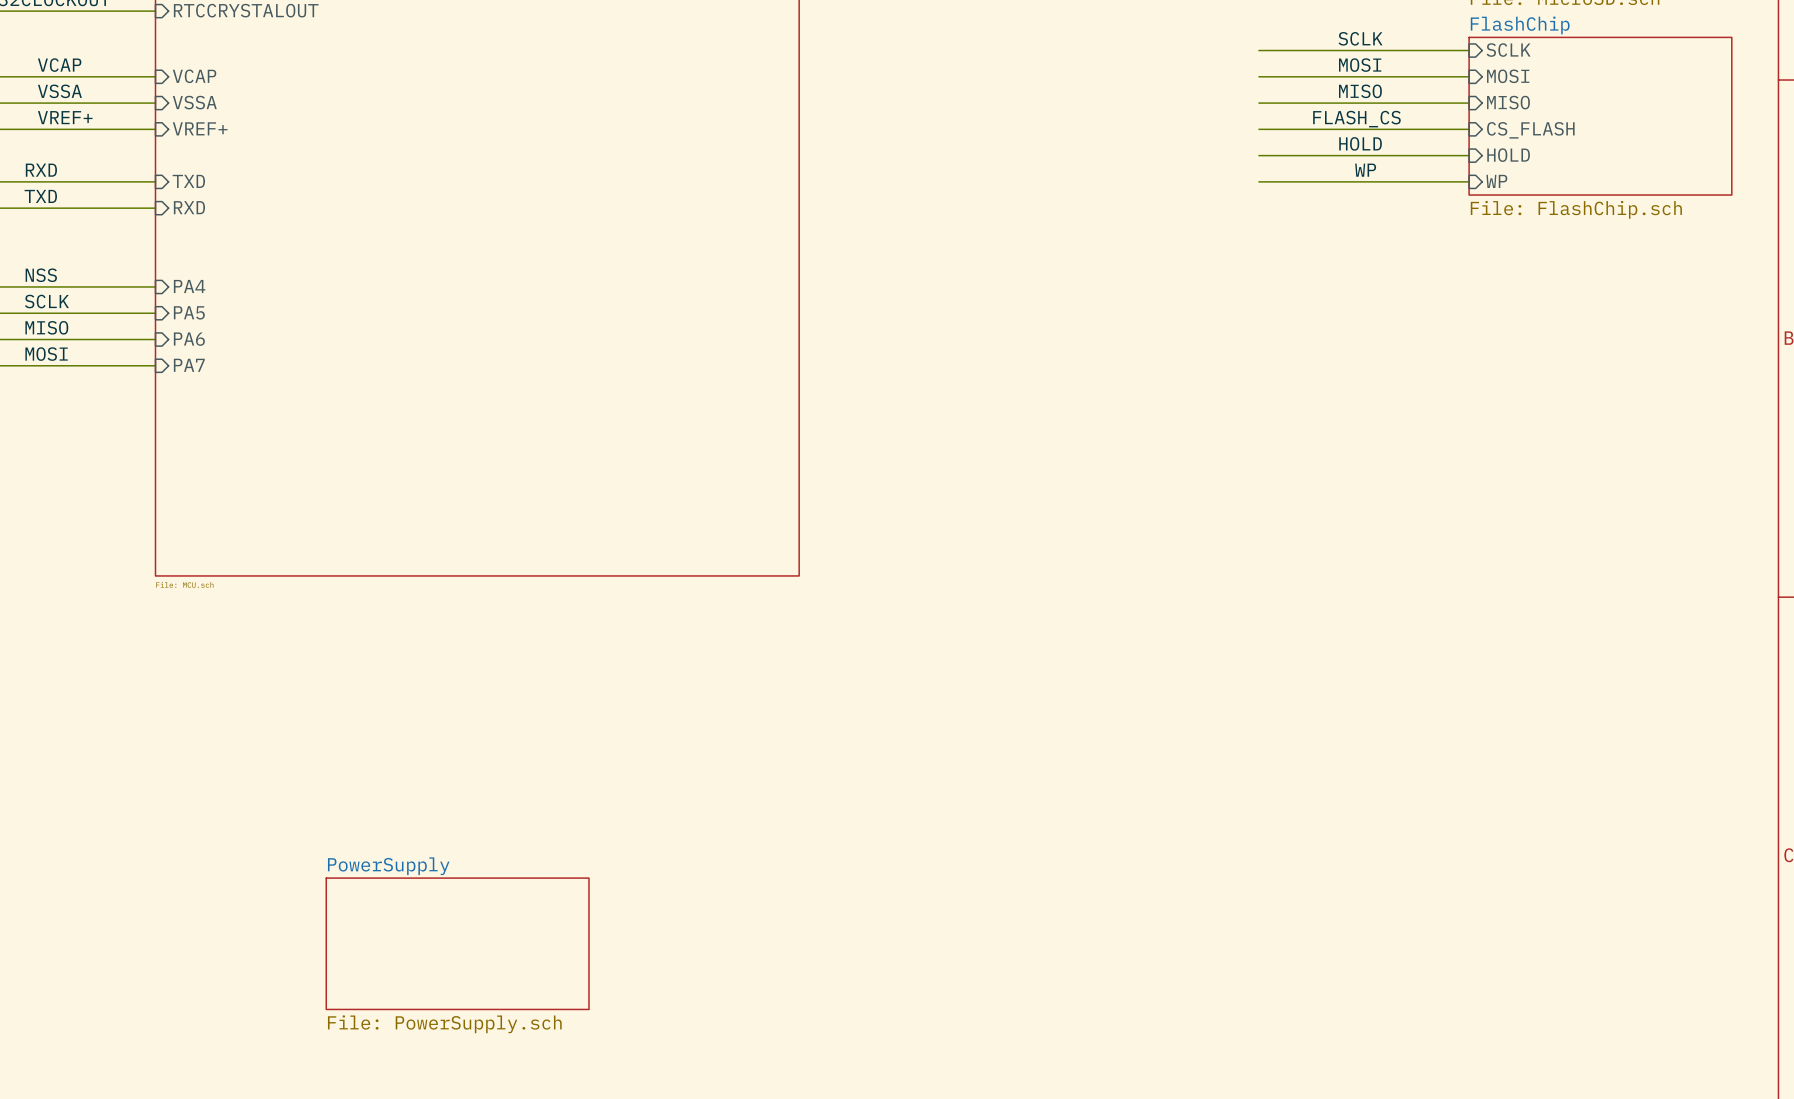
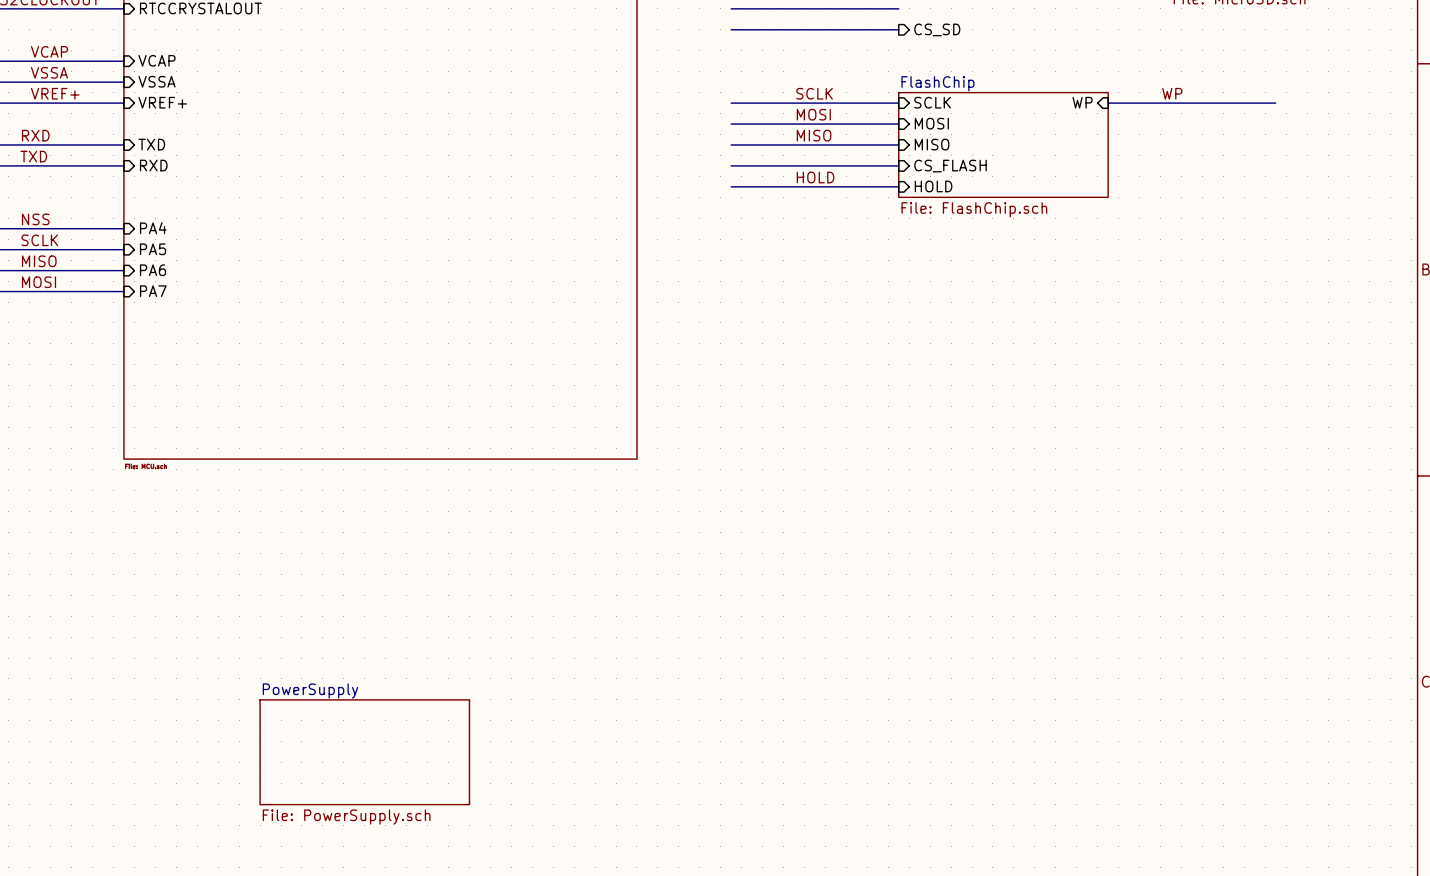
wire: none -> (731, 8) (898, 8)
wire: none -> (731, 29) (898, 29)
sheet pin: none -> CS_SD (937, 29)
label: SCLK (1360, 38) -> none
wire: (1258, 50) (1469, 50) -> none
sheet pin: SCLK (1508, 50) -> none
label: MOSI (1360, 65) -> none
wire: (1258, 76) (1469, 76) -> none
sheet pin: MOSI (1508, 76) -> none
label: MISO (1360, 91) -> none
sheet pin: MISO (1508, 102) -> none
wire: (1258, 103) (1469, 103) -> none
sheet FlashChip: File: FlashChip.sch (1600, 116) -> none
label: none -> SCLK (814, 93)
label: FLASH_CS (1356, 119) -> none
sheet pin: none -> SCLK (932, 102)
wire: none -> (731, 103) (898, 103)
wire: (1258, 129) (1390, 129) -> (1170, 103) (1275, 103)
sheet pin: CS_FLASH (1530, 130) -> none
label: none -> MOSI (813, 114)
label: HOLD (1360, 143) -> none
wire: none -> (731, 124) (898, 124)
sheet pin: none -> MOSI (931, 123)
wire: (1258, 155) (1469, 155) -> none
sheet pin: HOLD (1508, 155) -> none
label: none -> MISO (814, 135)
label position: WP (1365, 170) -> WP (1172, 93)
wire: none -> (731, 144) (898, 144)
sheet pin: none -> MISO (932, 144)
wire: (1258, 181) (1469, 181) -> none
sheet FlashChip: none -> File: FlashChip.sch (1003, 144)
sheet pin rotation: 0° (1496, 181) -> 180° (1082, 102)
sheet pin position: WP (1496, 181) -> WP (1082, 102)
wire: none -> (731, 165) (898, 165)
sheet pin: none -> CS_FLASH (950, 166)
label: none -> HOLD (815, 177)
sheet pin: none -> HOLD (933, 186)
wire: none -> (731, 186) (898, 186)

